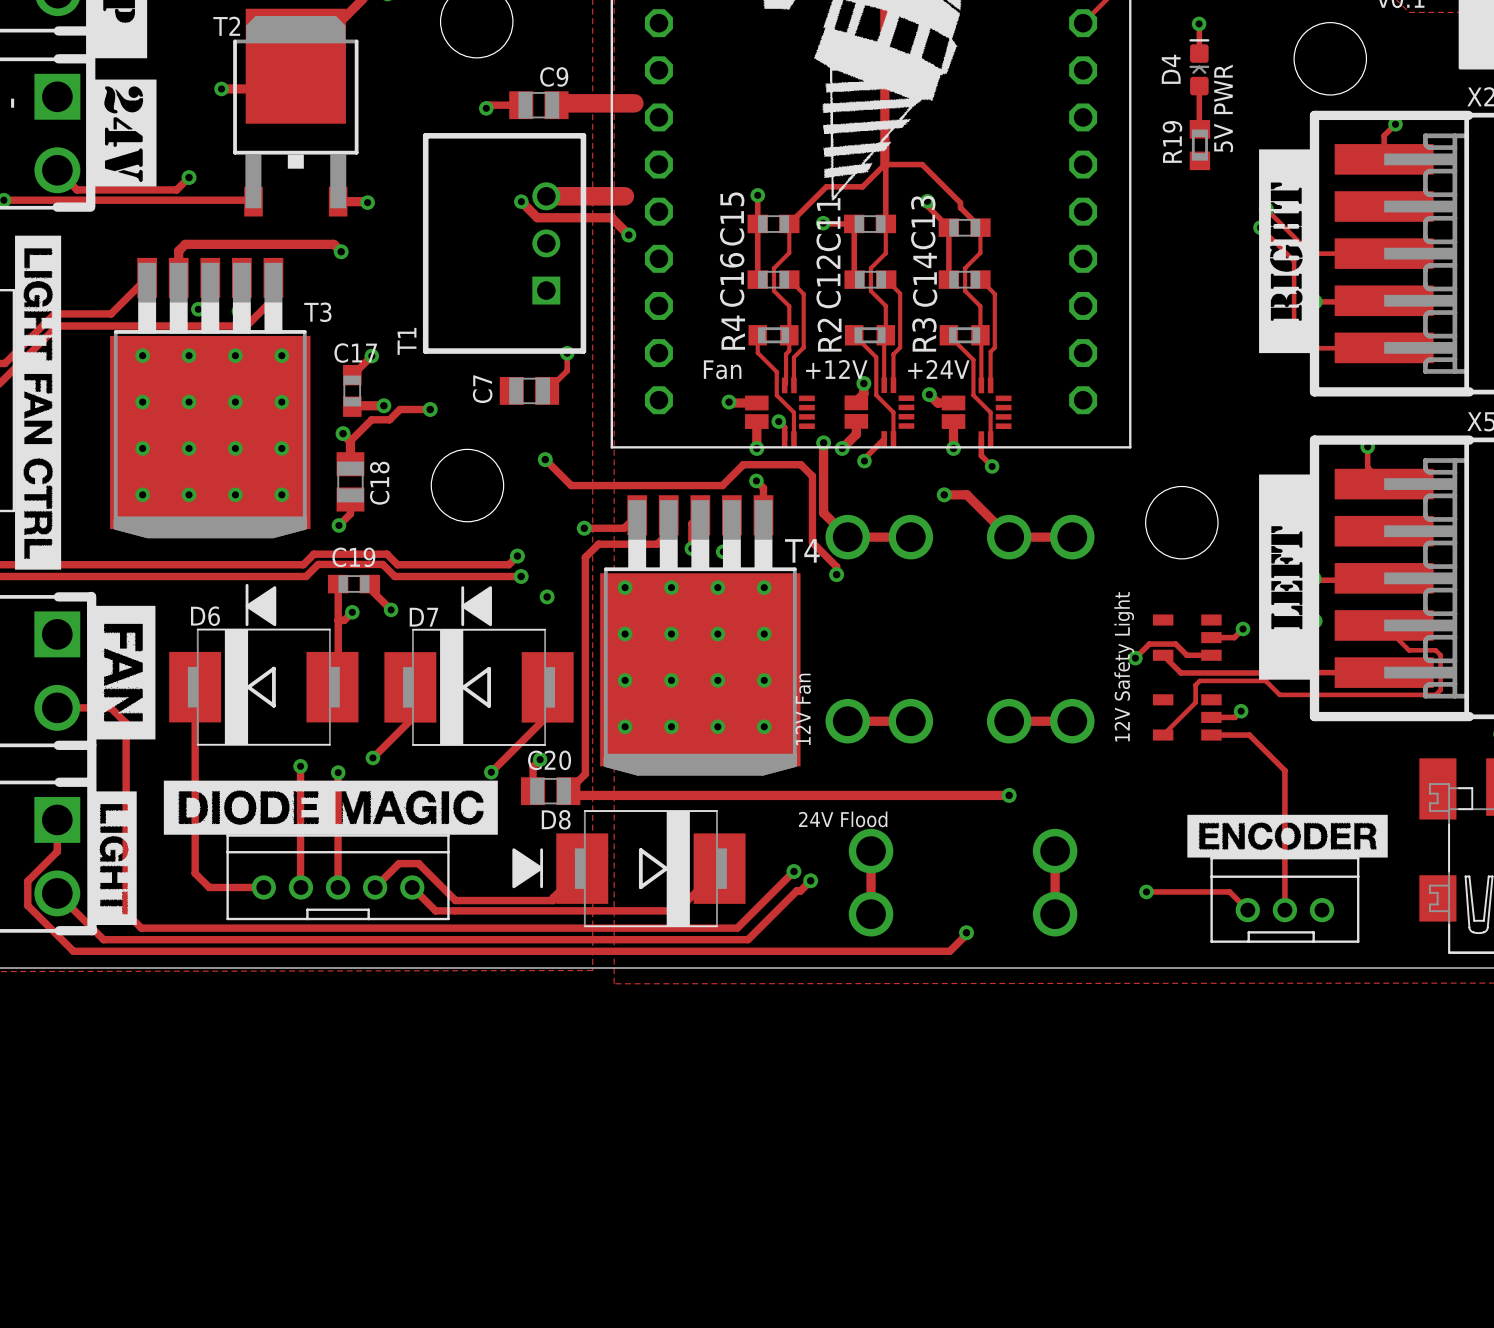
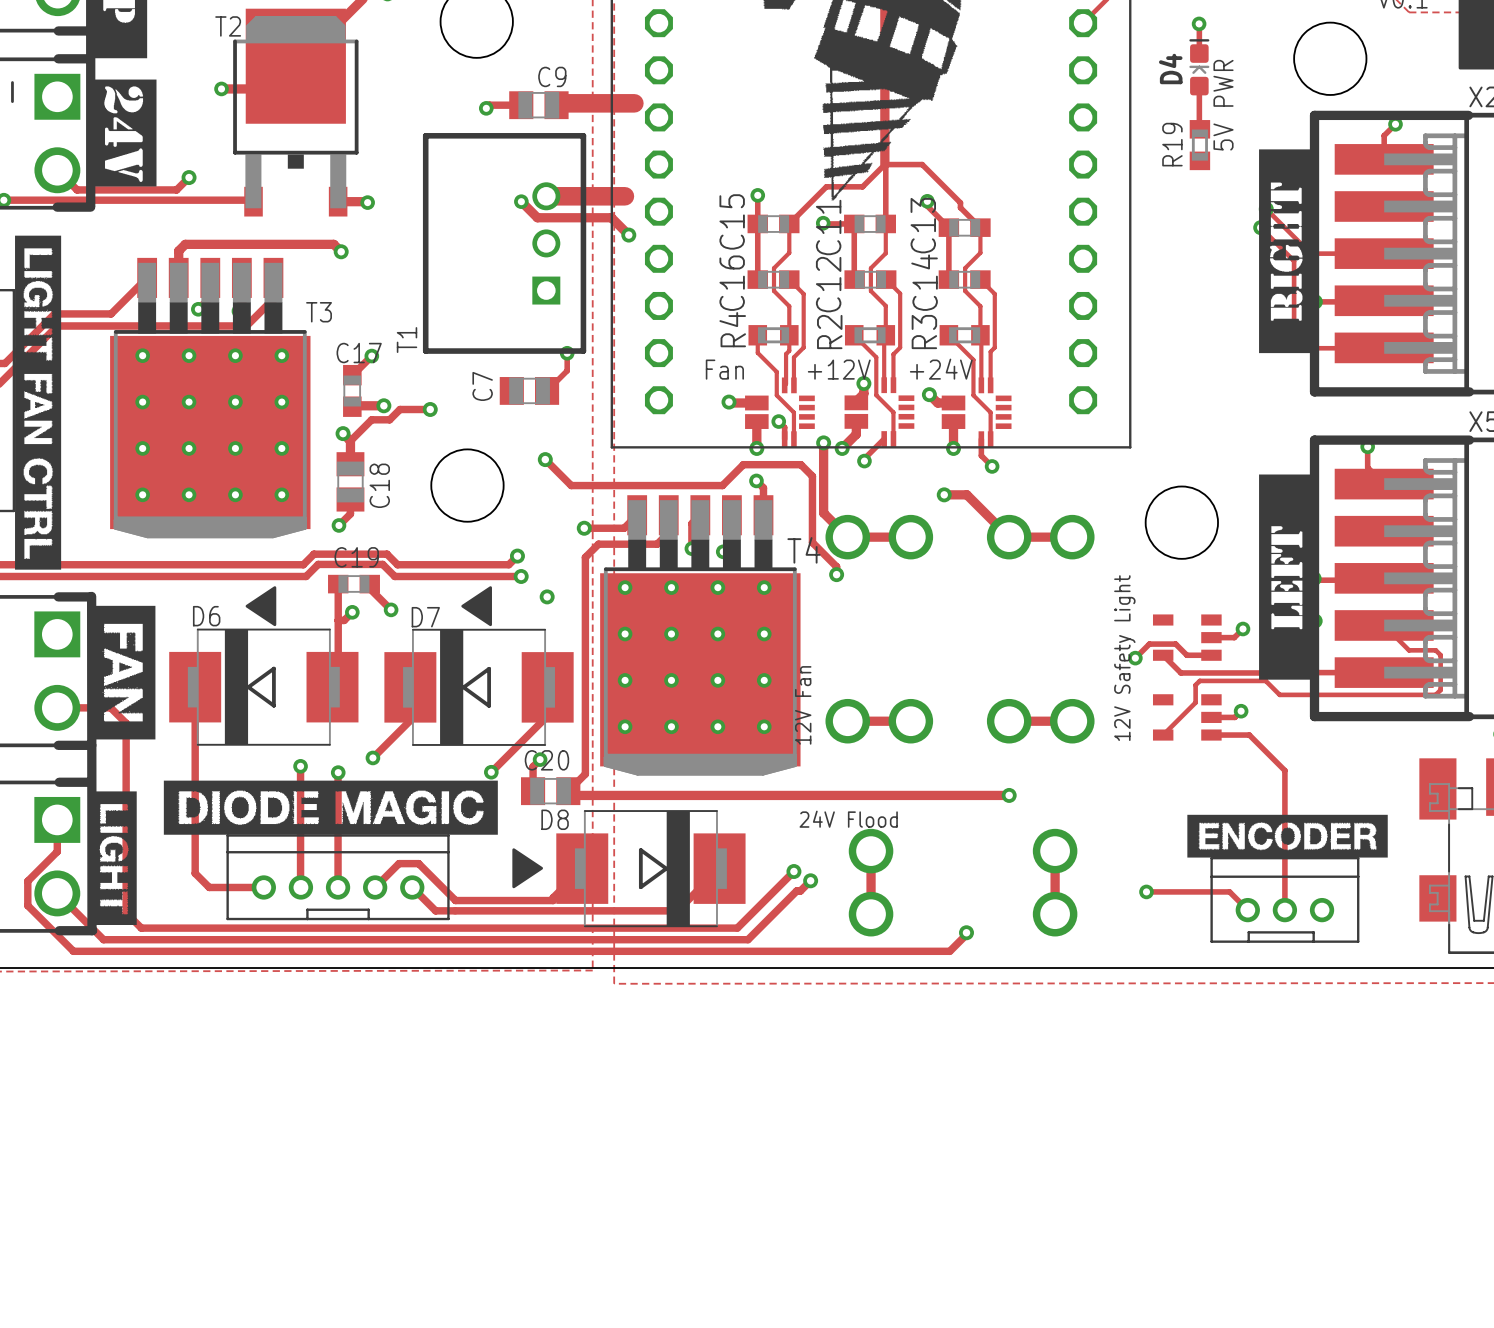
line: (247, 585) (247, 624) -> none
line: (462, 587) (462, 624) -> none
line: (541, 849) (541, 886) -> none

